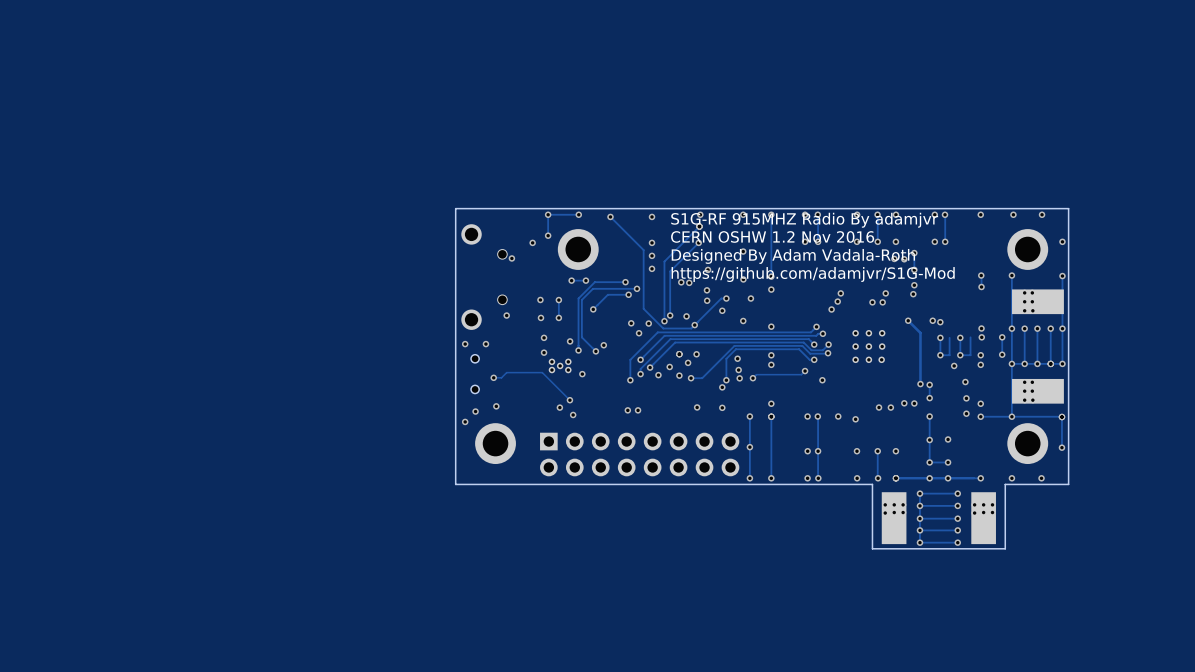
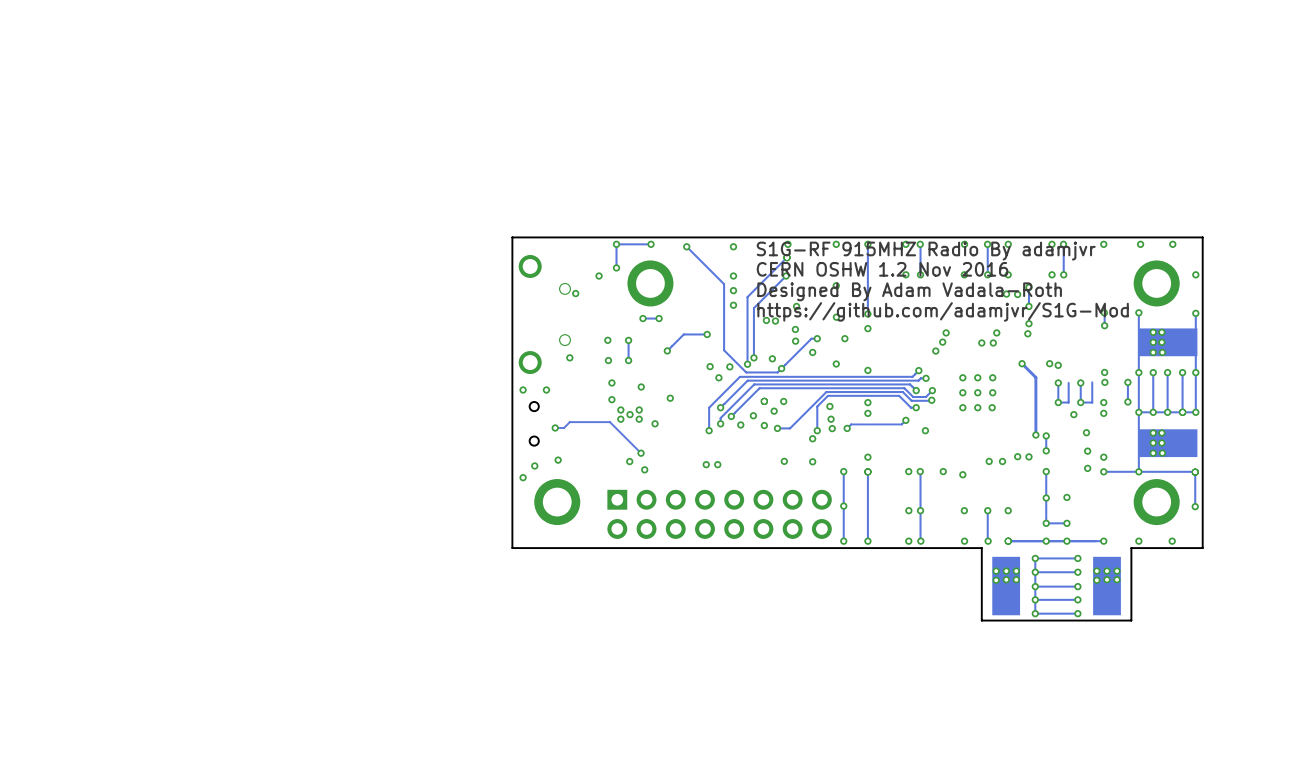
track: (625, 282) (594, 282) (578, 298) (578, 350) -> none
via: (625, 282) -> none
track: (637, 288) (593, 288) (581, 299) (581, 337) (595, 351) -> none
via: (637, 288) -> none
via: (603, 345) -> none
via: (578, 350) -> none

